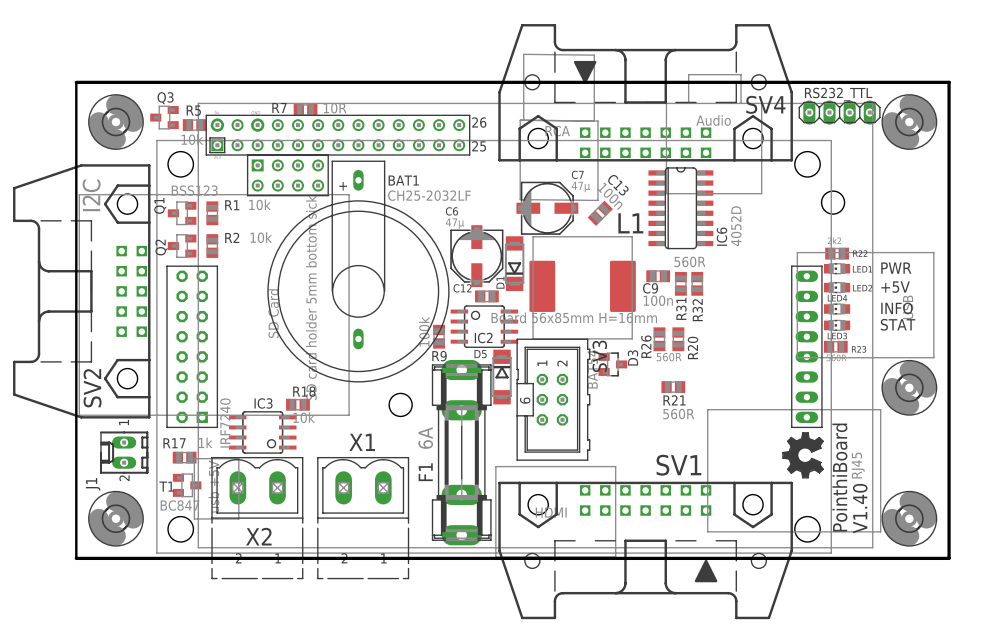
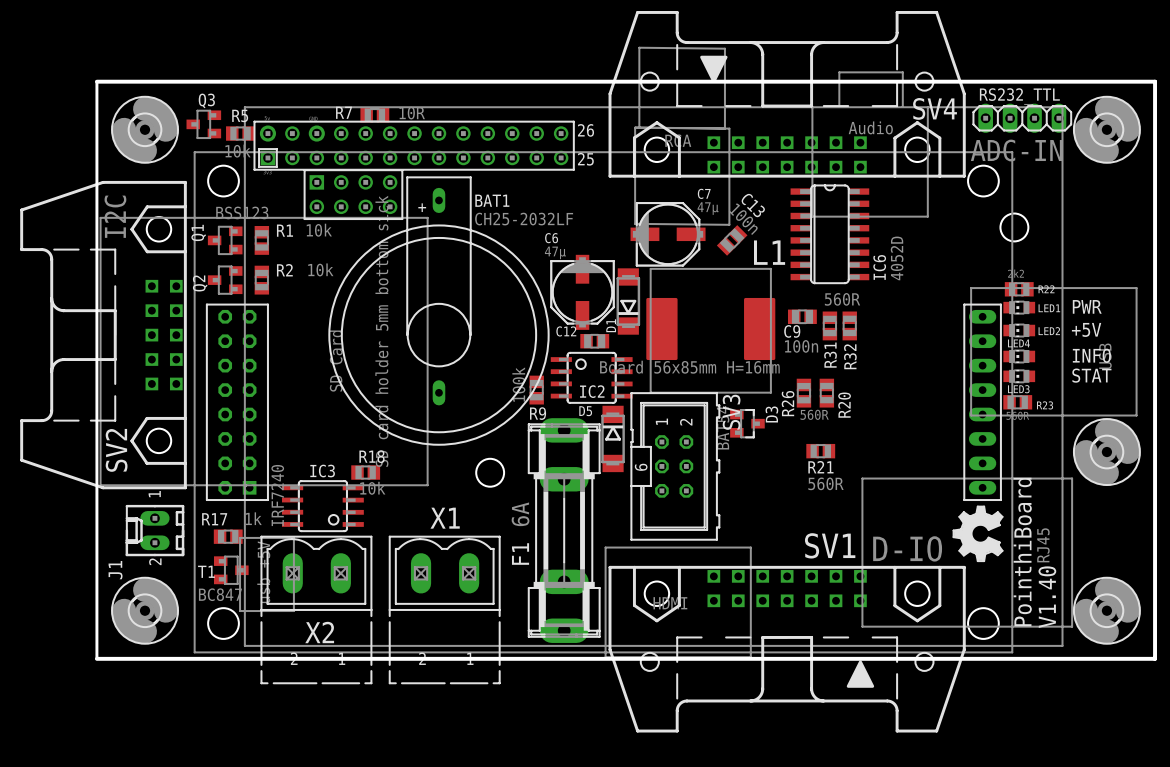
SV4 value: none -> ADC-IN (1016, 150)
SV1 value: none -> D-IO (907, 548)

